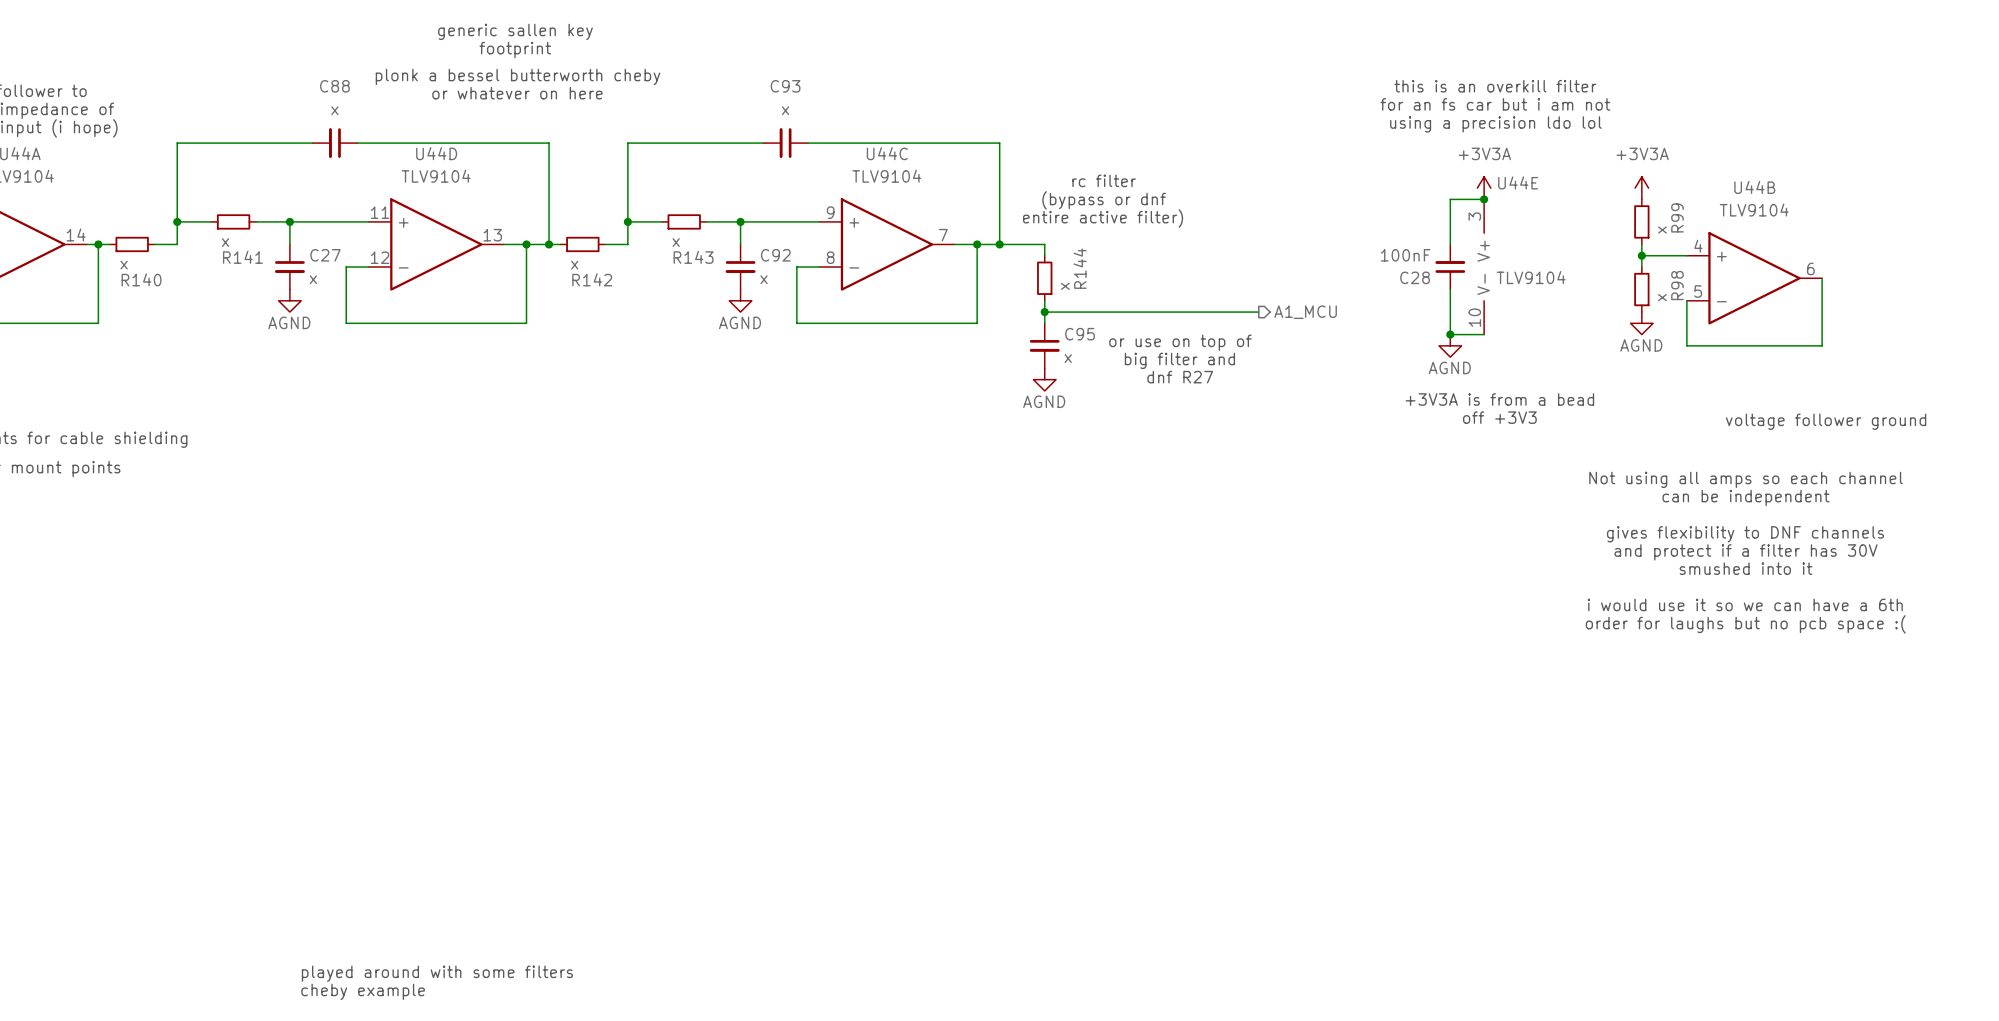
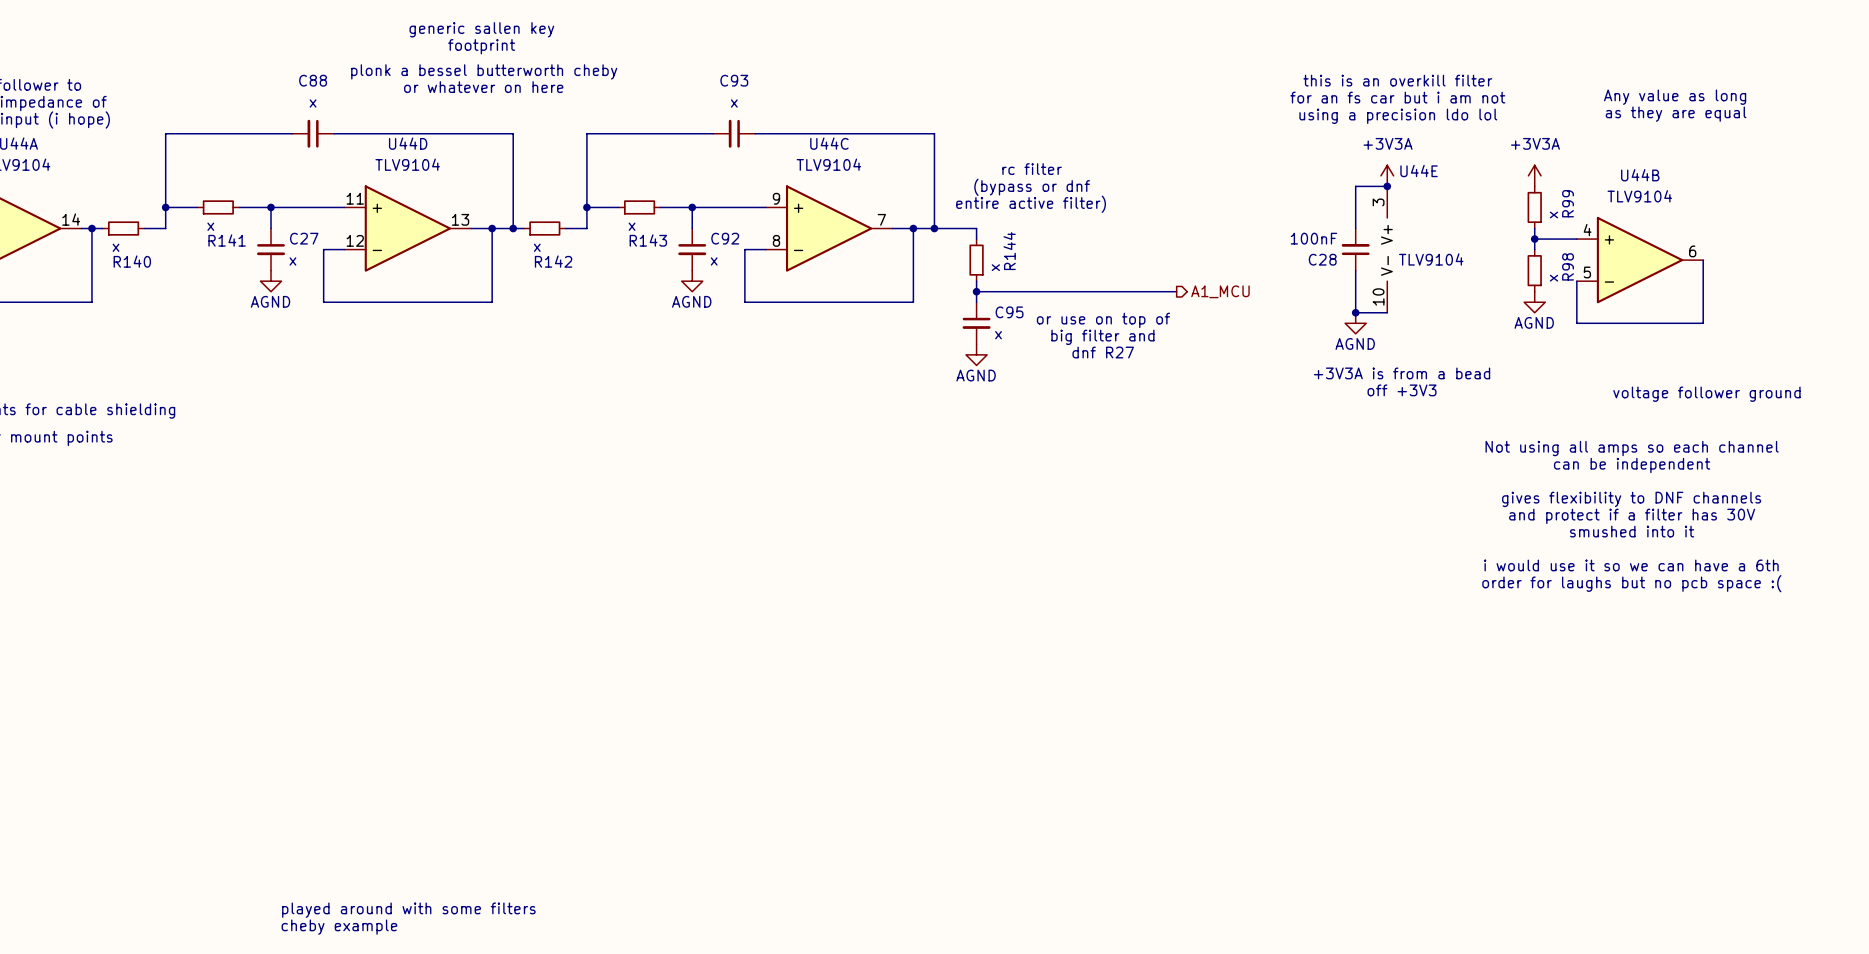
text: none -> Any value as long (1675, 97)
text: none -> as they are equal (1676, 114)

